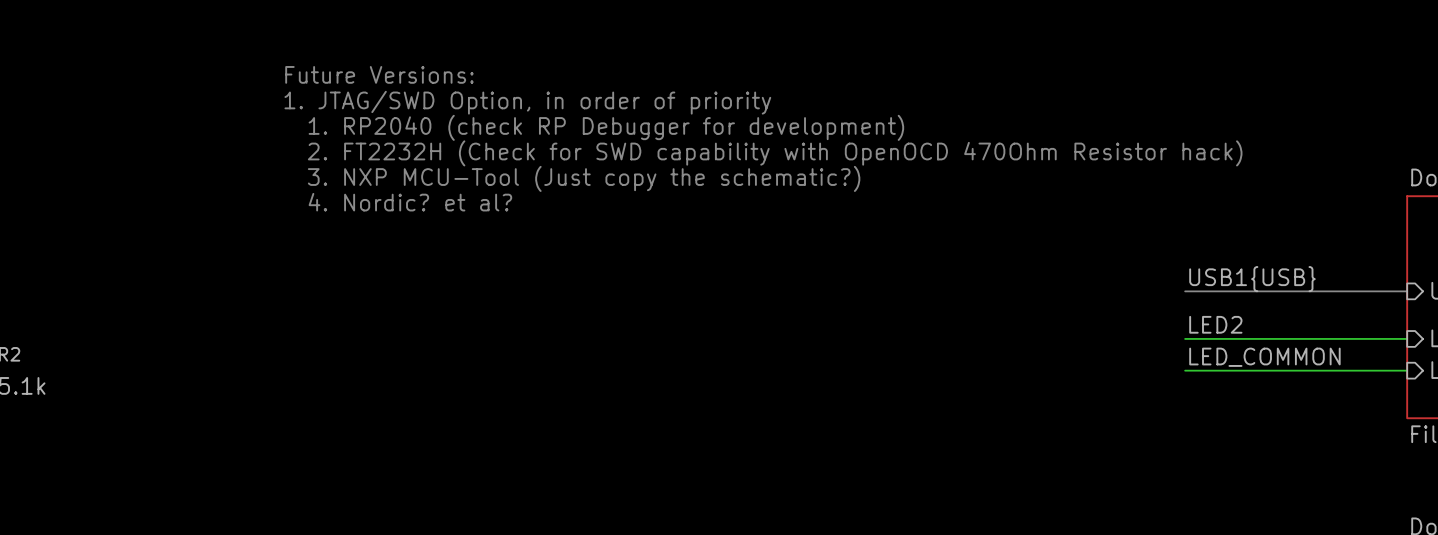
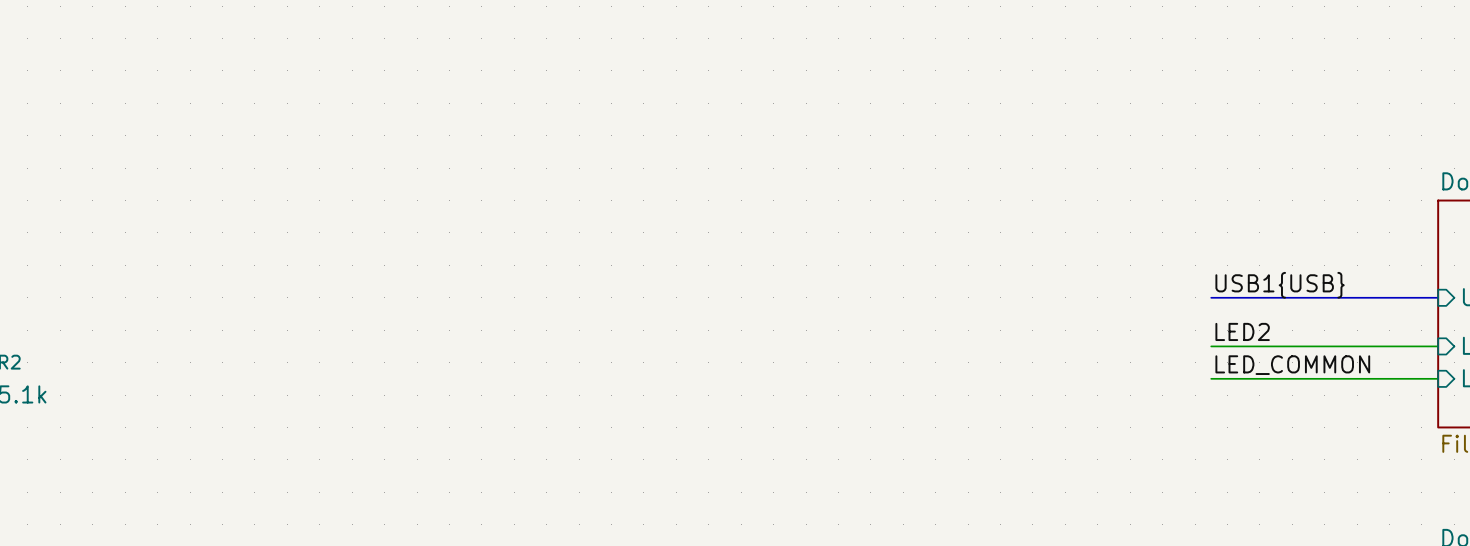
text: Future Versions: (379, 74) -> none
text: 1. JTAG/SWD Option, in order of priority (527, 102) -> none
text: 1. RP2040 (check RP Debugger for development) (606, 127) -> none
text: 2. FT2232H (Check for SWD capability with OpenOCD 470Ohm Resistor hack) (775, 153) -> none
text: 3. NXP MCU-Tool (Just copy the schematic?) (584, 178) -> none
text: 4. Nordic? et al? (410, 202) -> none

